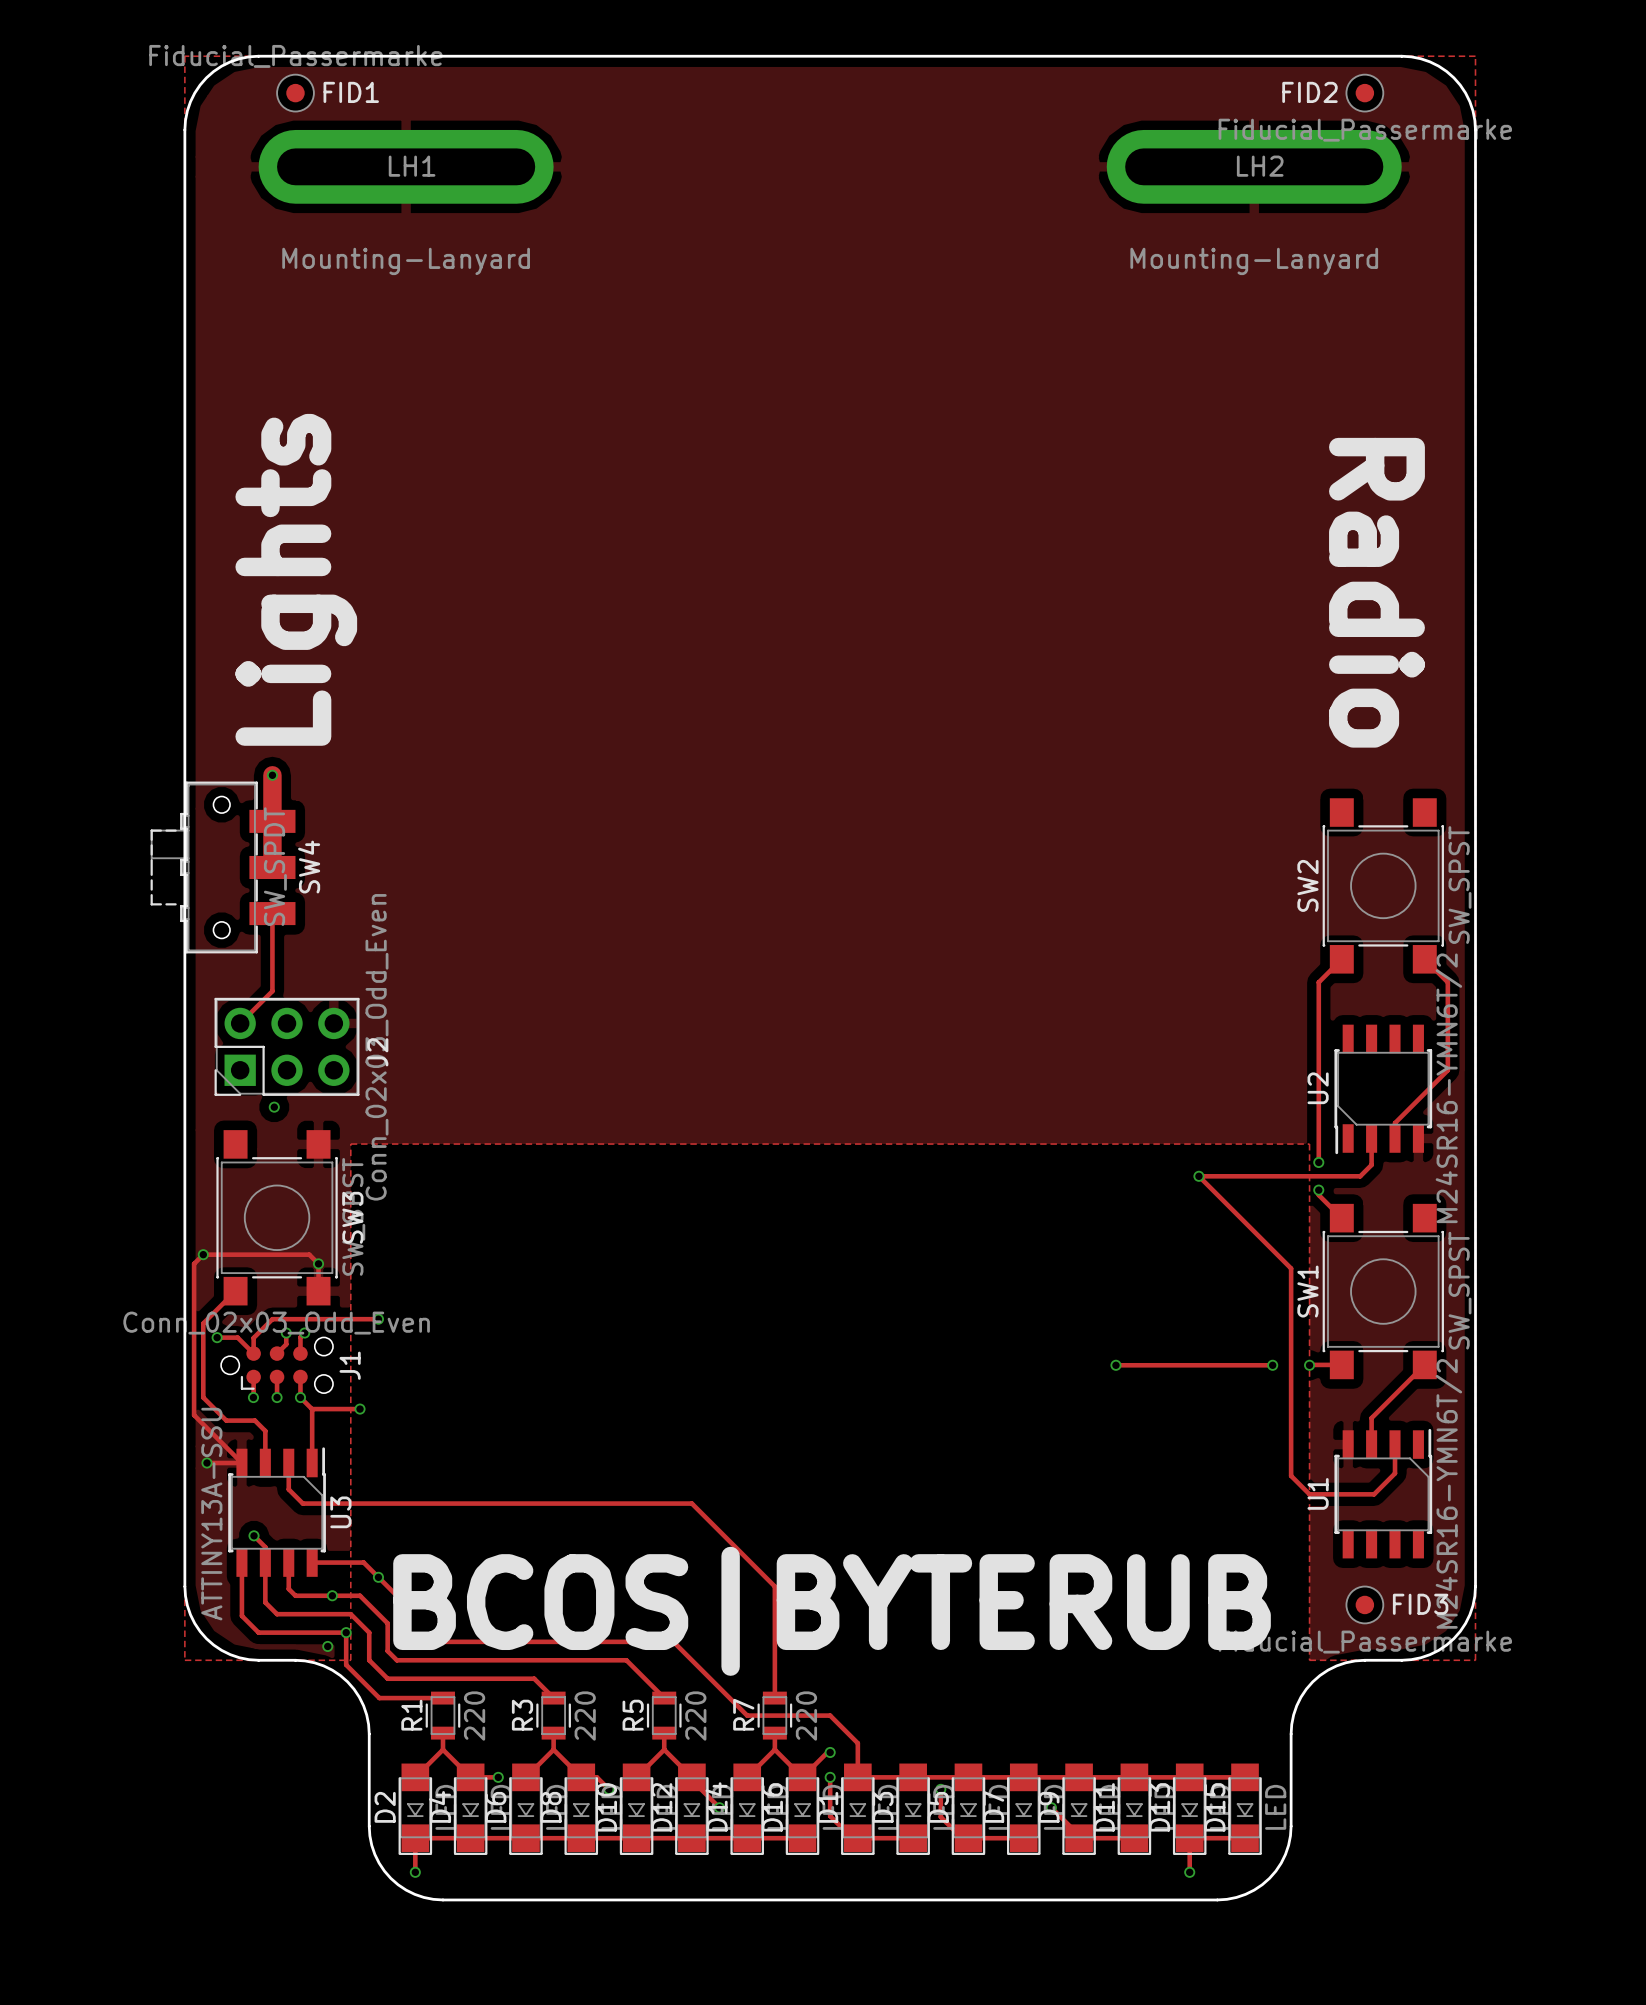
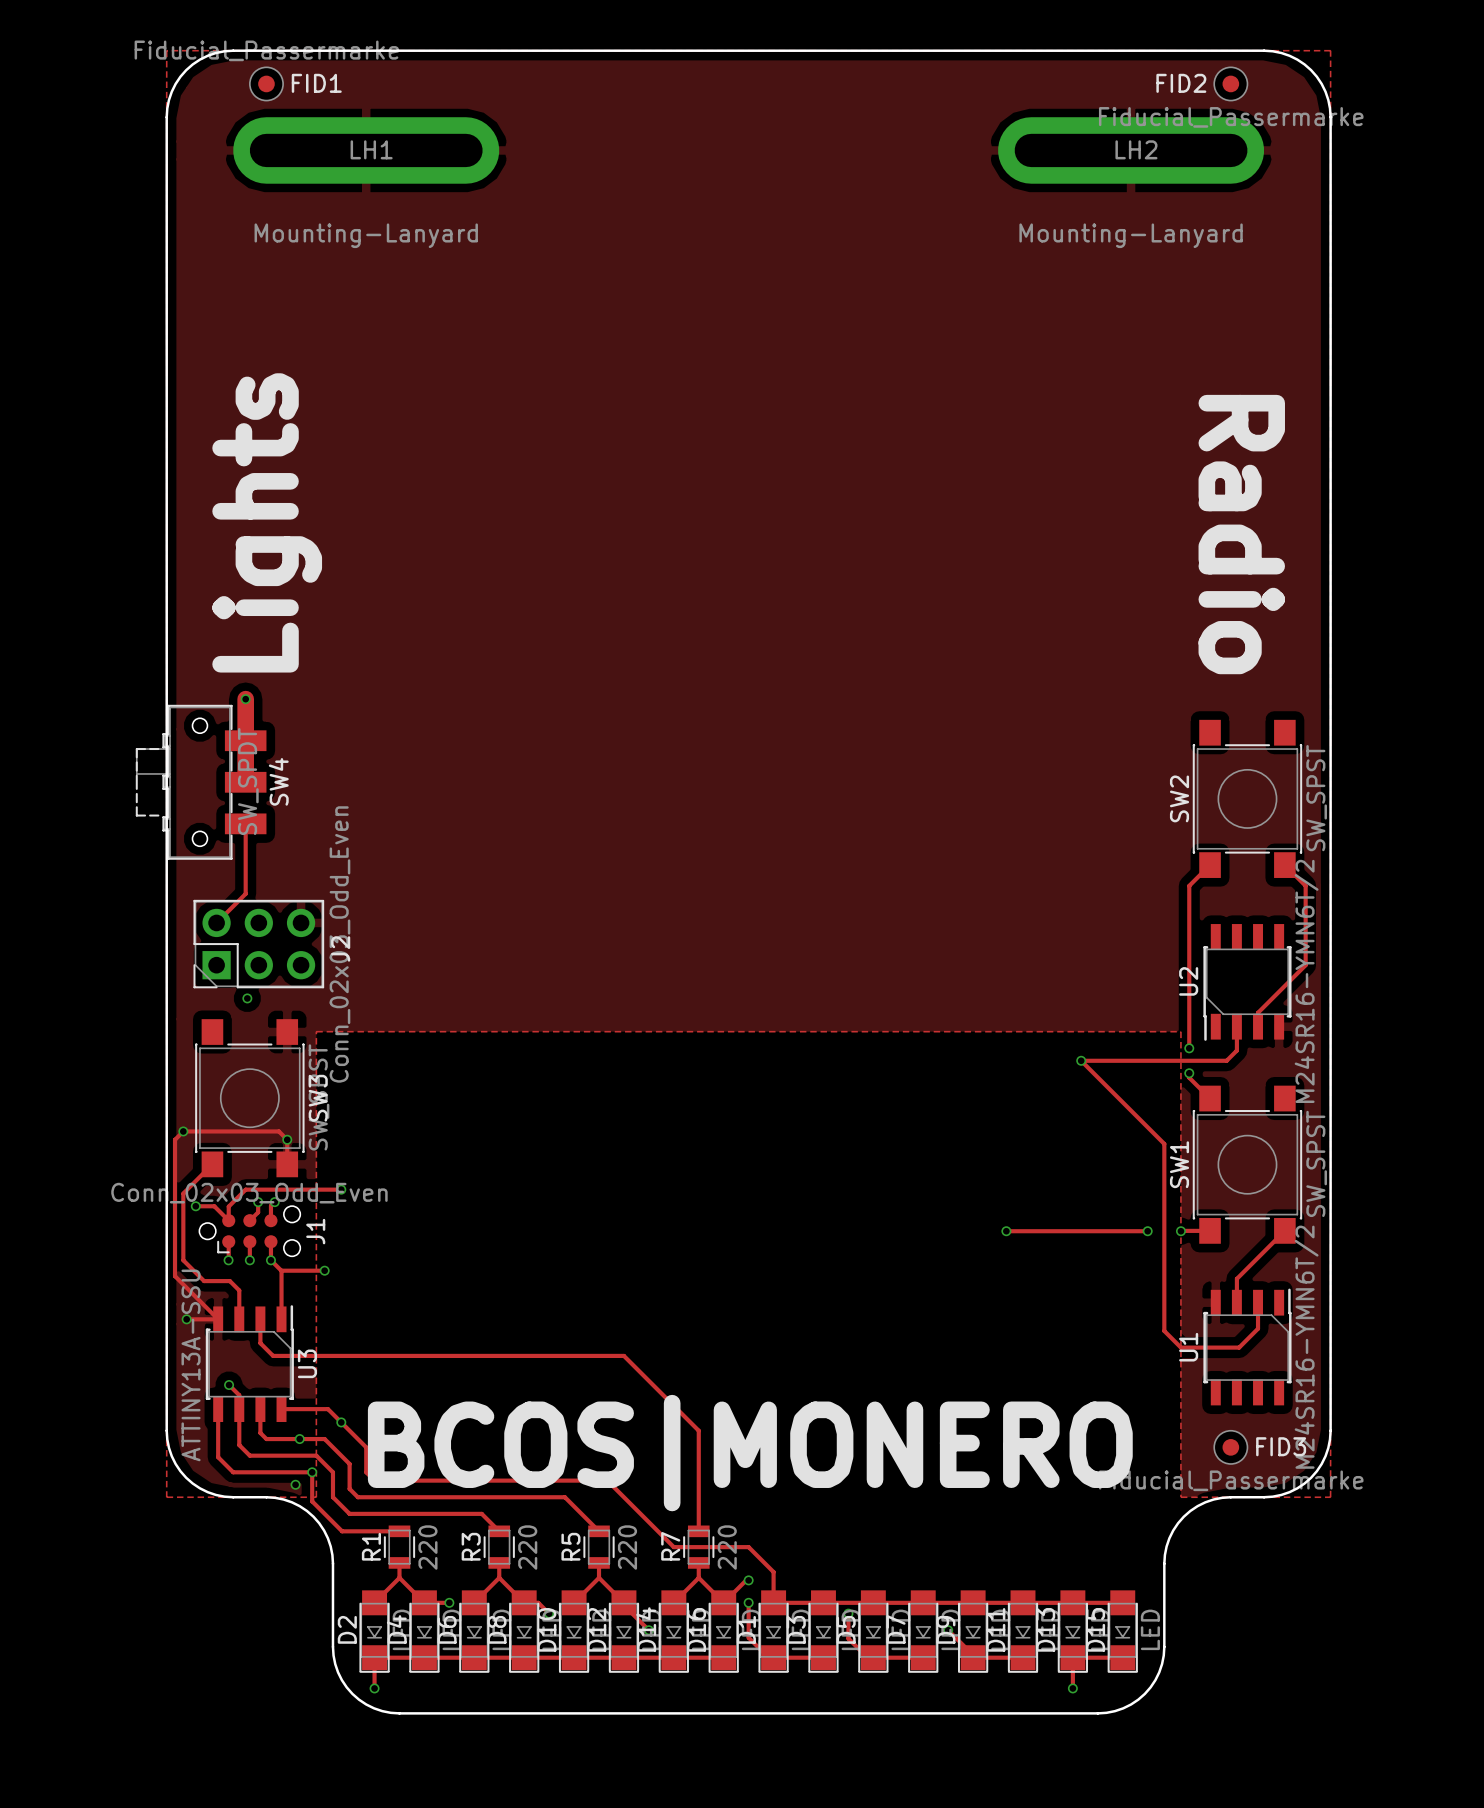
text: BCOS|BYTERUB (832, 1611) -> BCOS|MONERO (750, 1453)

